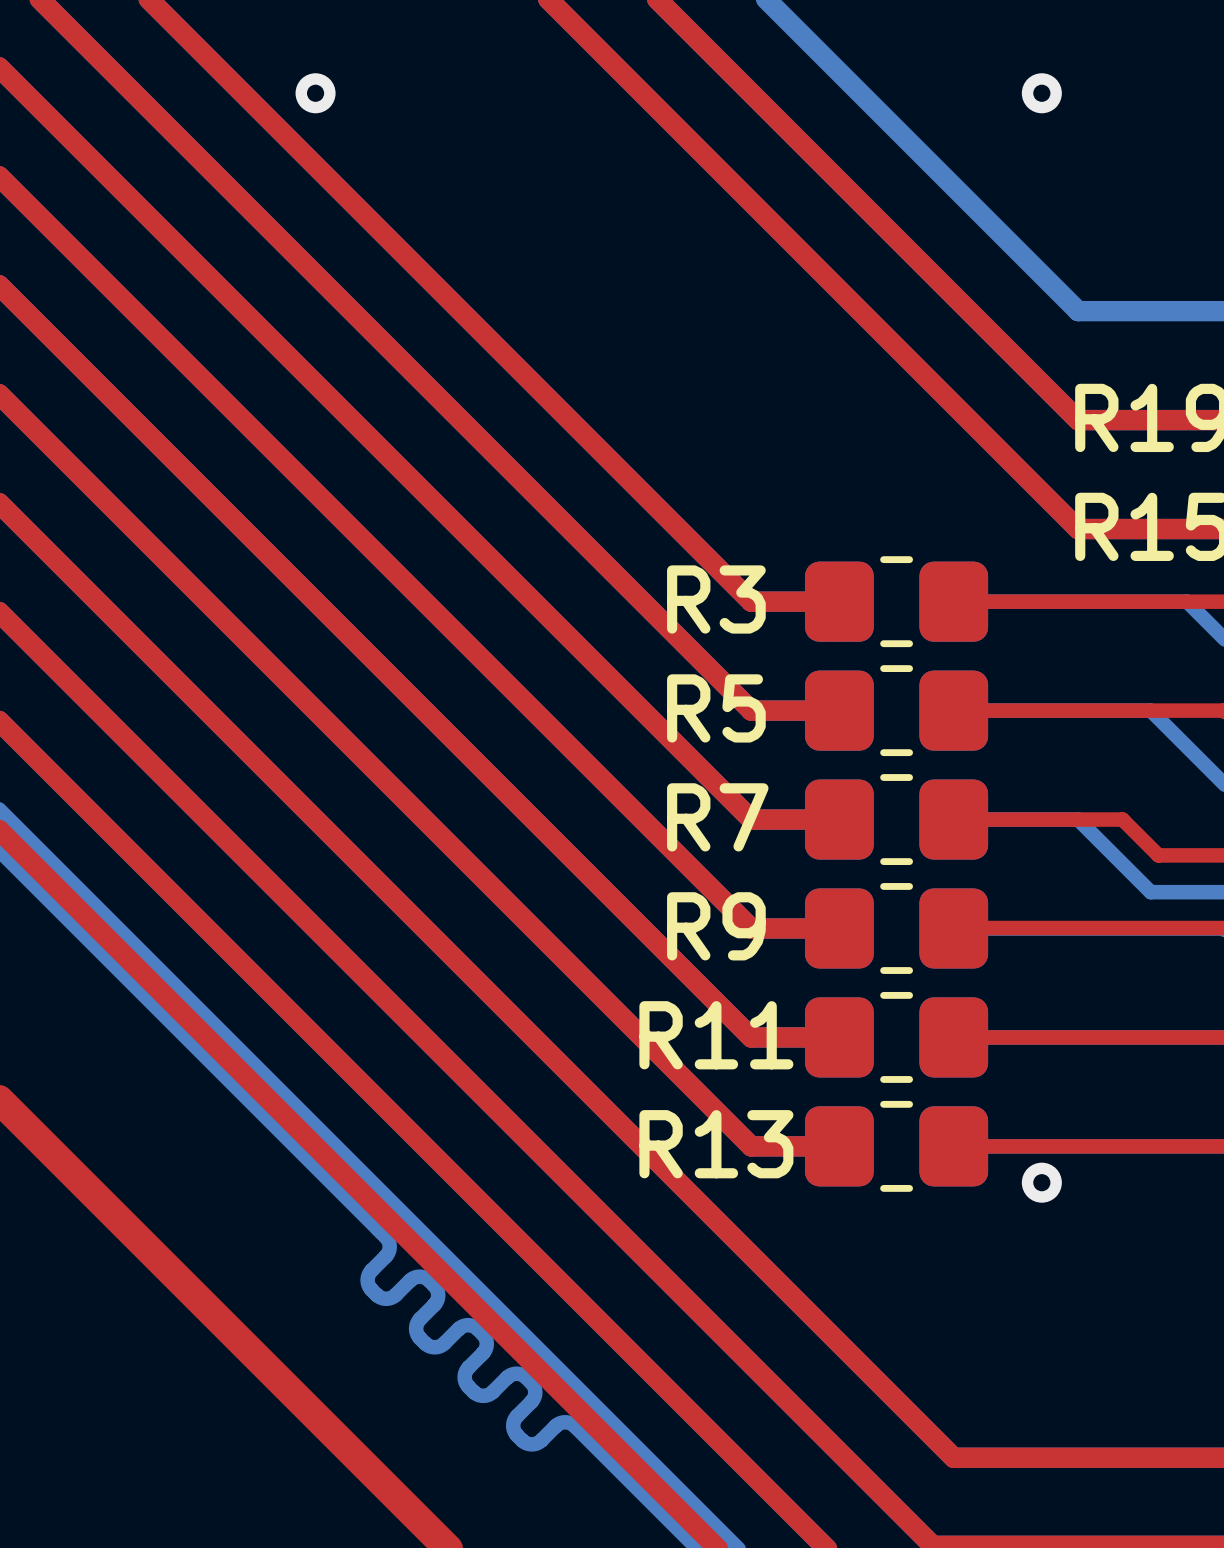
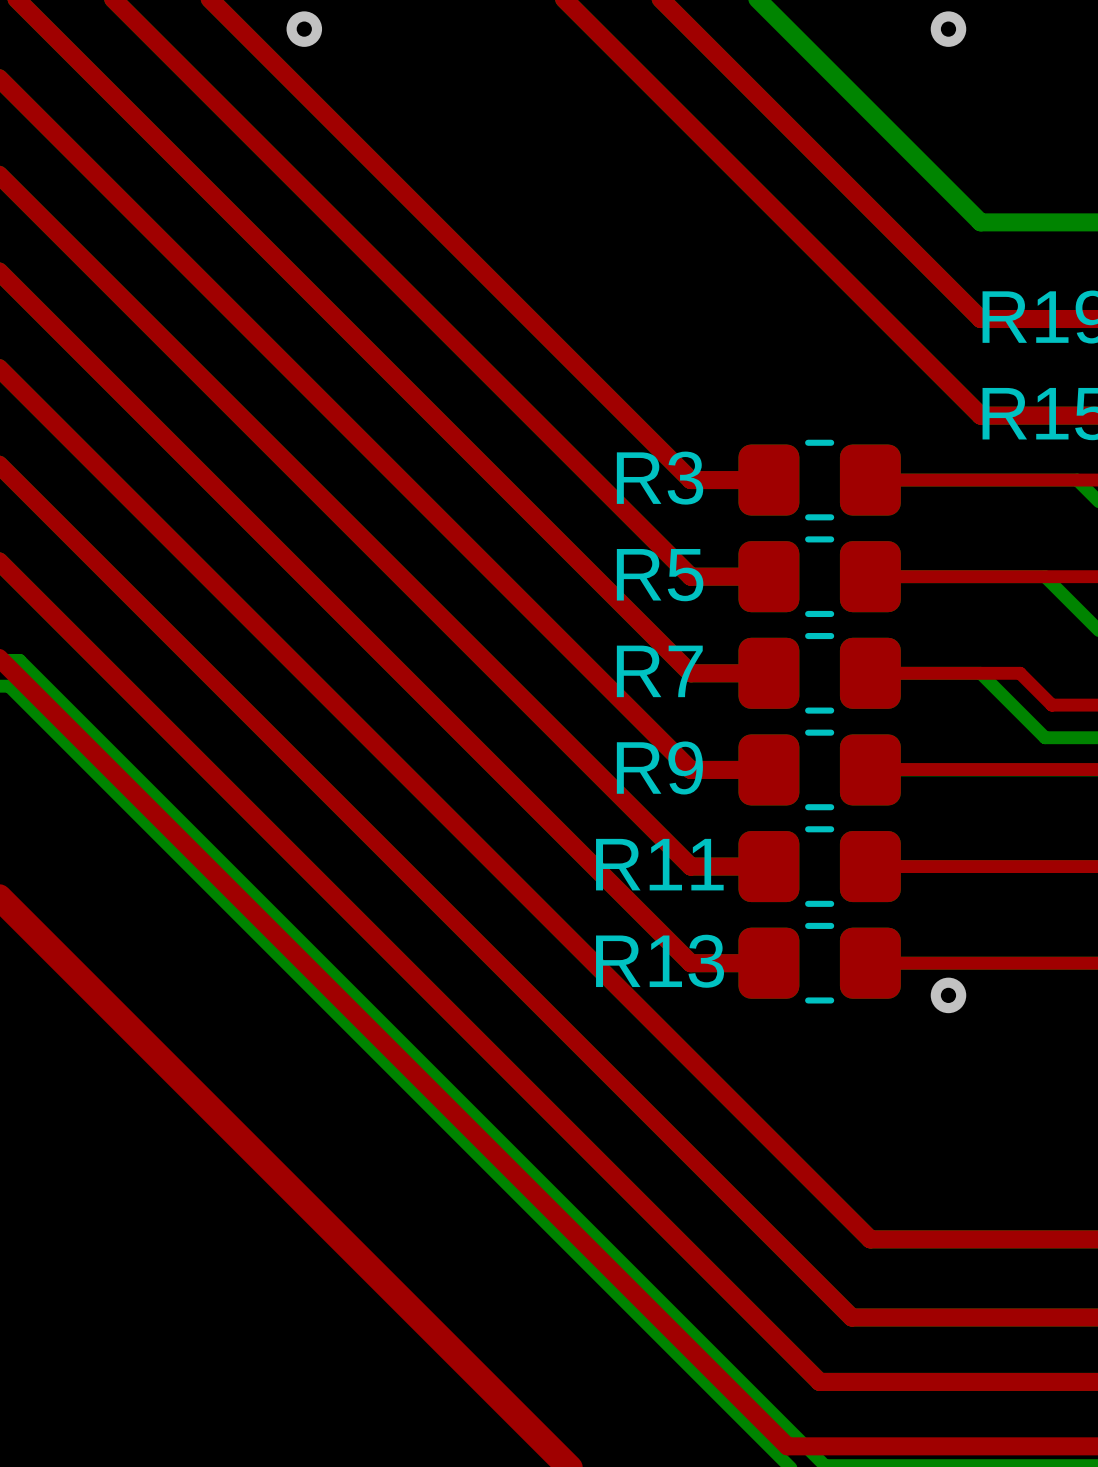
bottom track: (385, 1237) (389, 1243) (388, 1252) (370, 1271) (367, 1278) (368, 1286) (376, 1294) (384, 1298) (392, 1297) (416, 1277) (422, 1277) (429, 1280) -> (366, 1043) (405, 1082)
bottom track: (434, 1285) (437, 1291) (437, 1298) (417, 1323) (416, 1330) (420, 1338) (428, 1345) (436, 1347) (443, 1344) (462, 1326) (471, 1325) (477, 1329) -> (409, 1086) (448, 1125)
bottom track: (482, 1334) (486, 1342) (485, 1349) (465, 1374) (465, 1380) (468, 1386) (477, 1394) (484, 1395) (491, 1392) (510, 1375) (519, 1374) (526, 1377) -> (452, 1129) (491, 1168)
bottom track: (531, 1382) (534, 1388) (534, 1397) (513, 1422) (513, 1429) (517, 1435) (525, 1442) (533, 1444) (540, 1441) (559, 1423) (566, 1422) (574, 1426) -> (495, 1172) (534, 1211)

